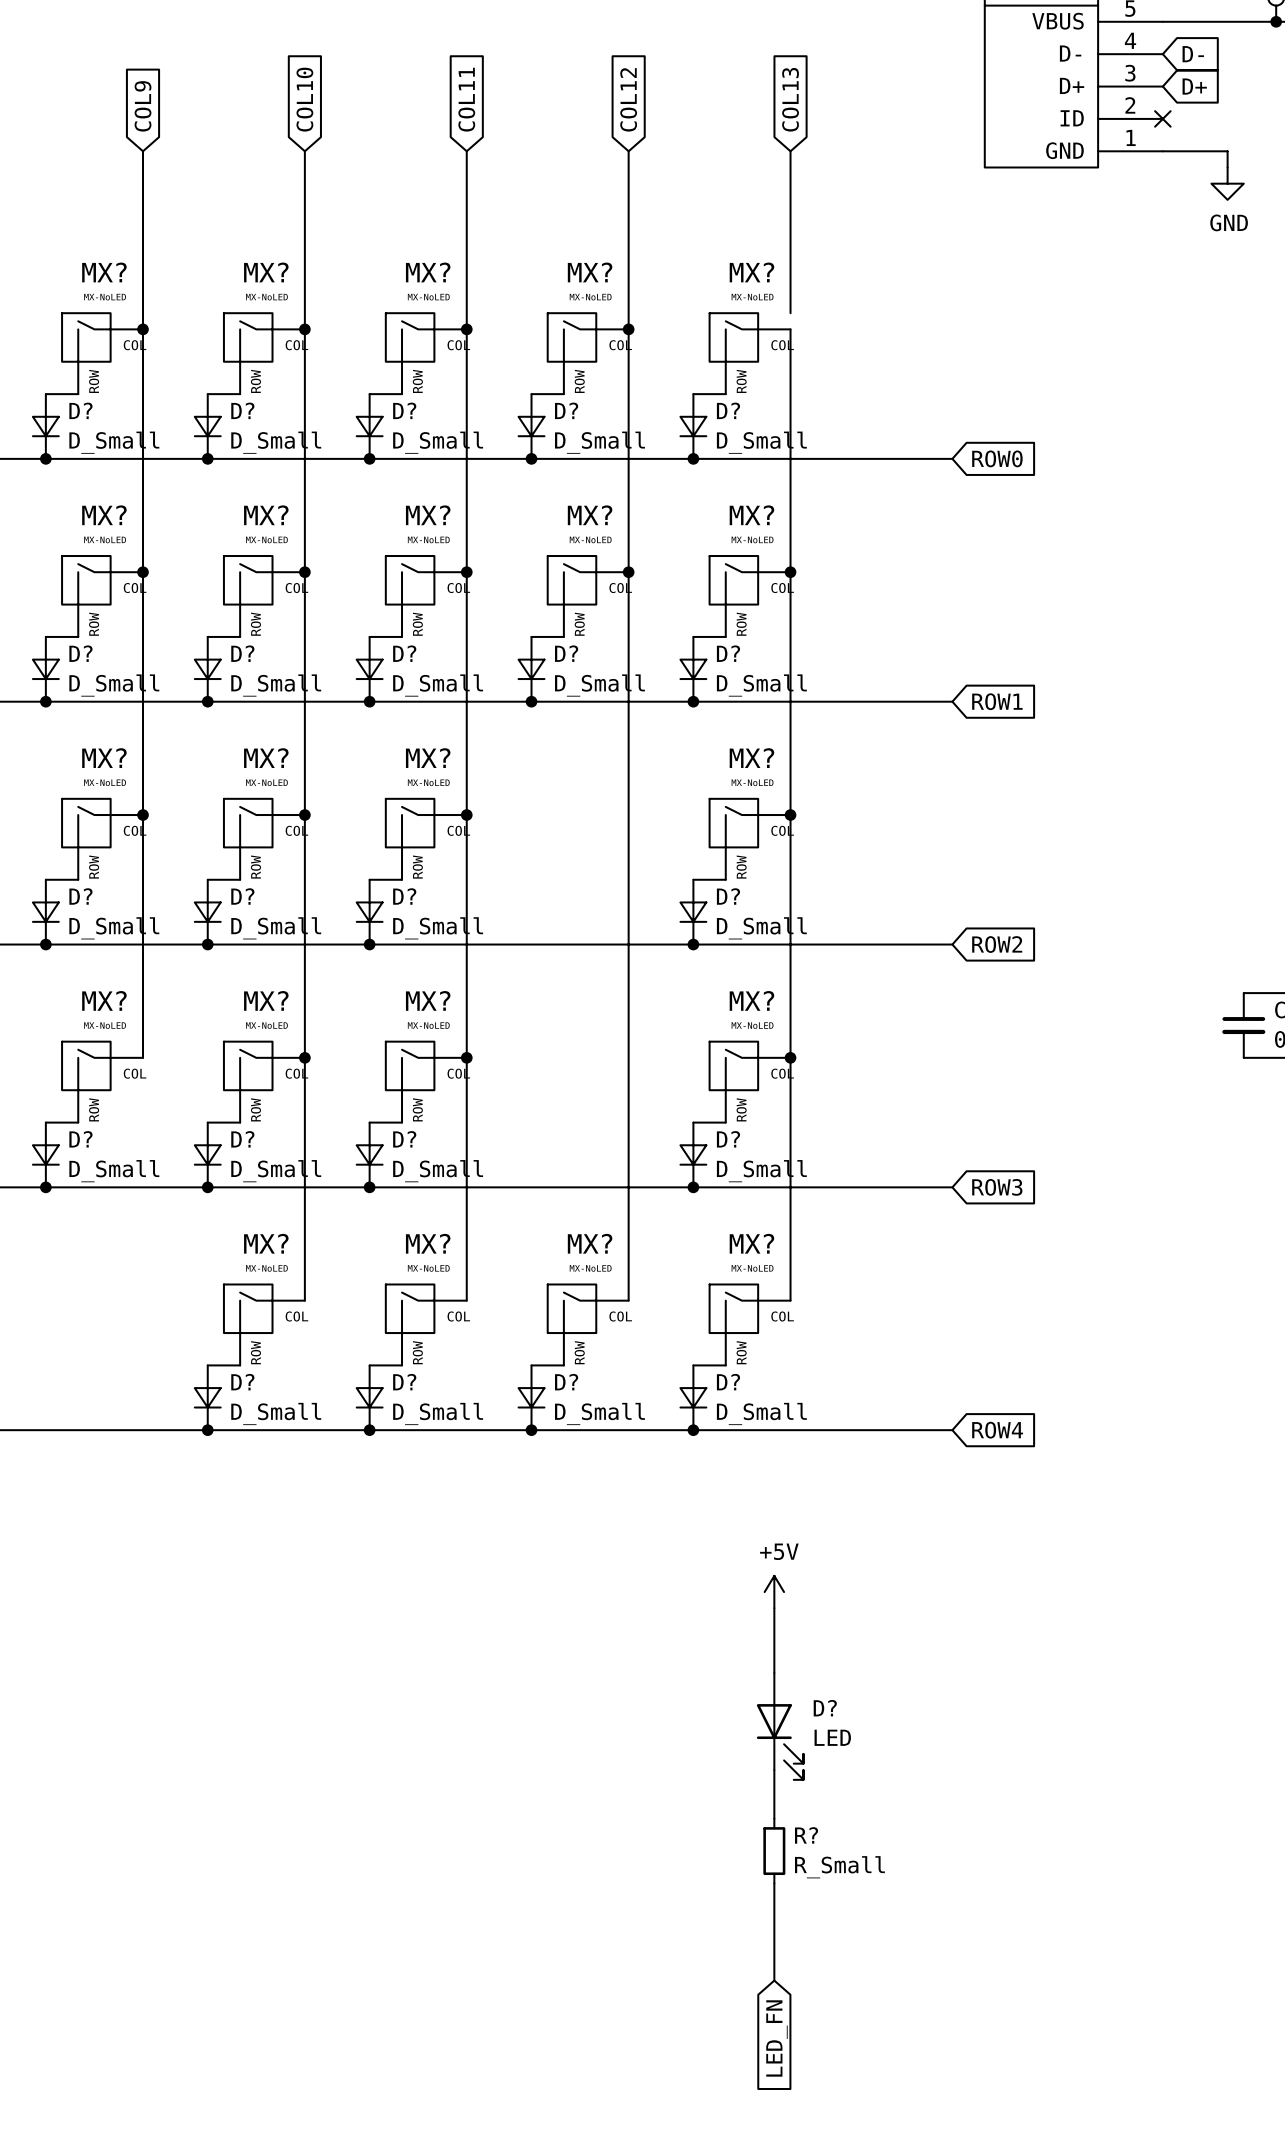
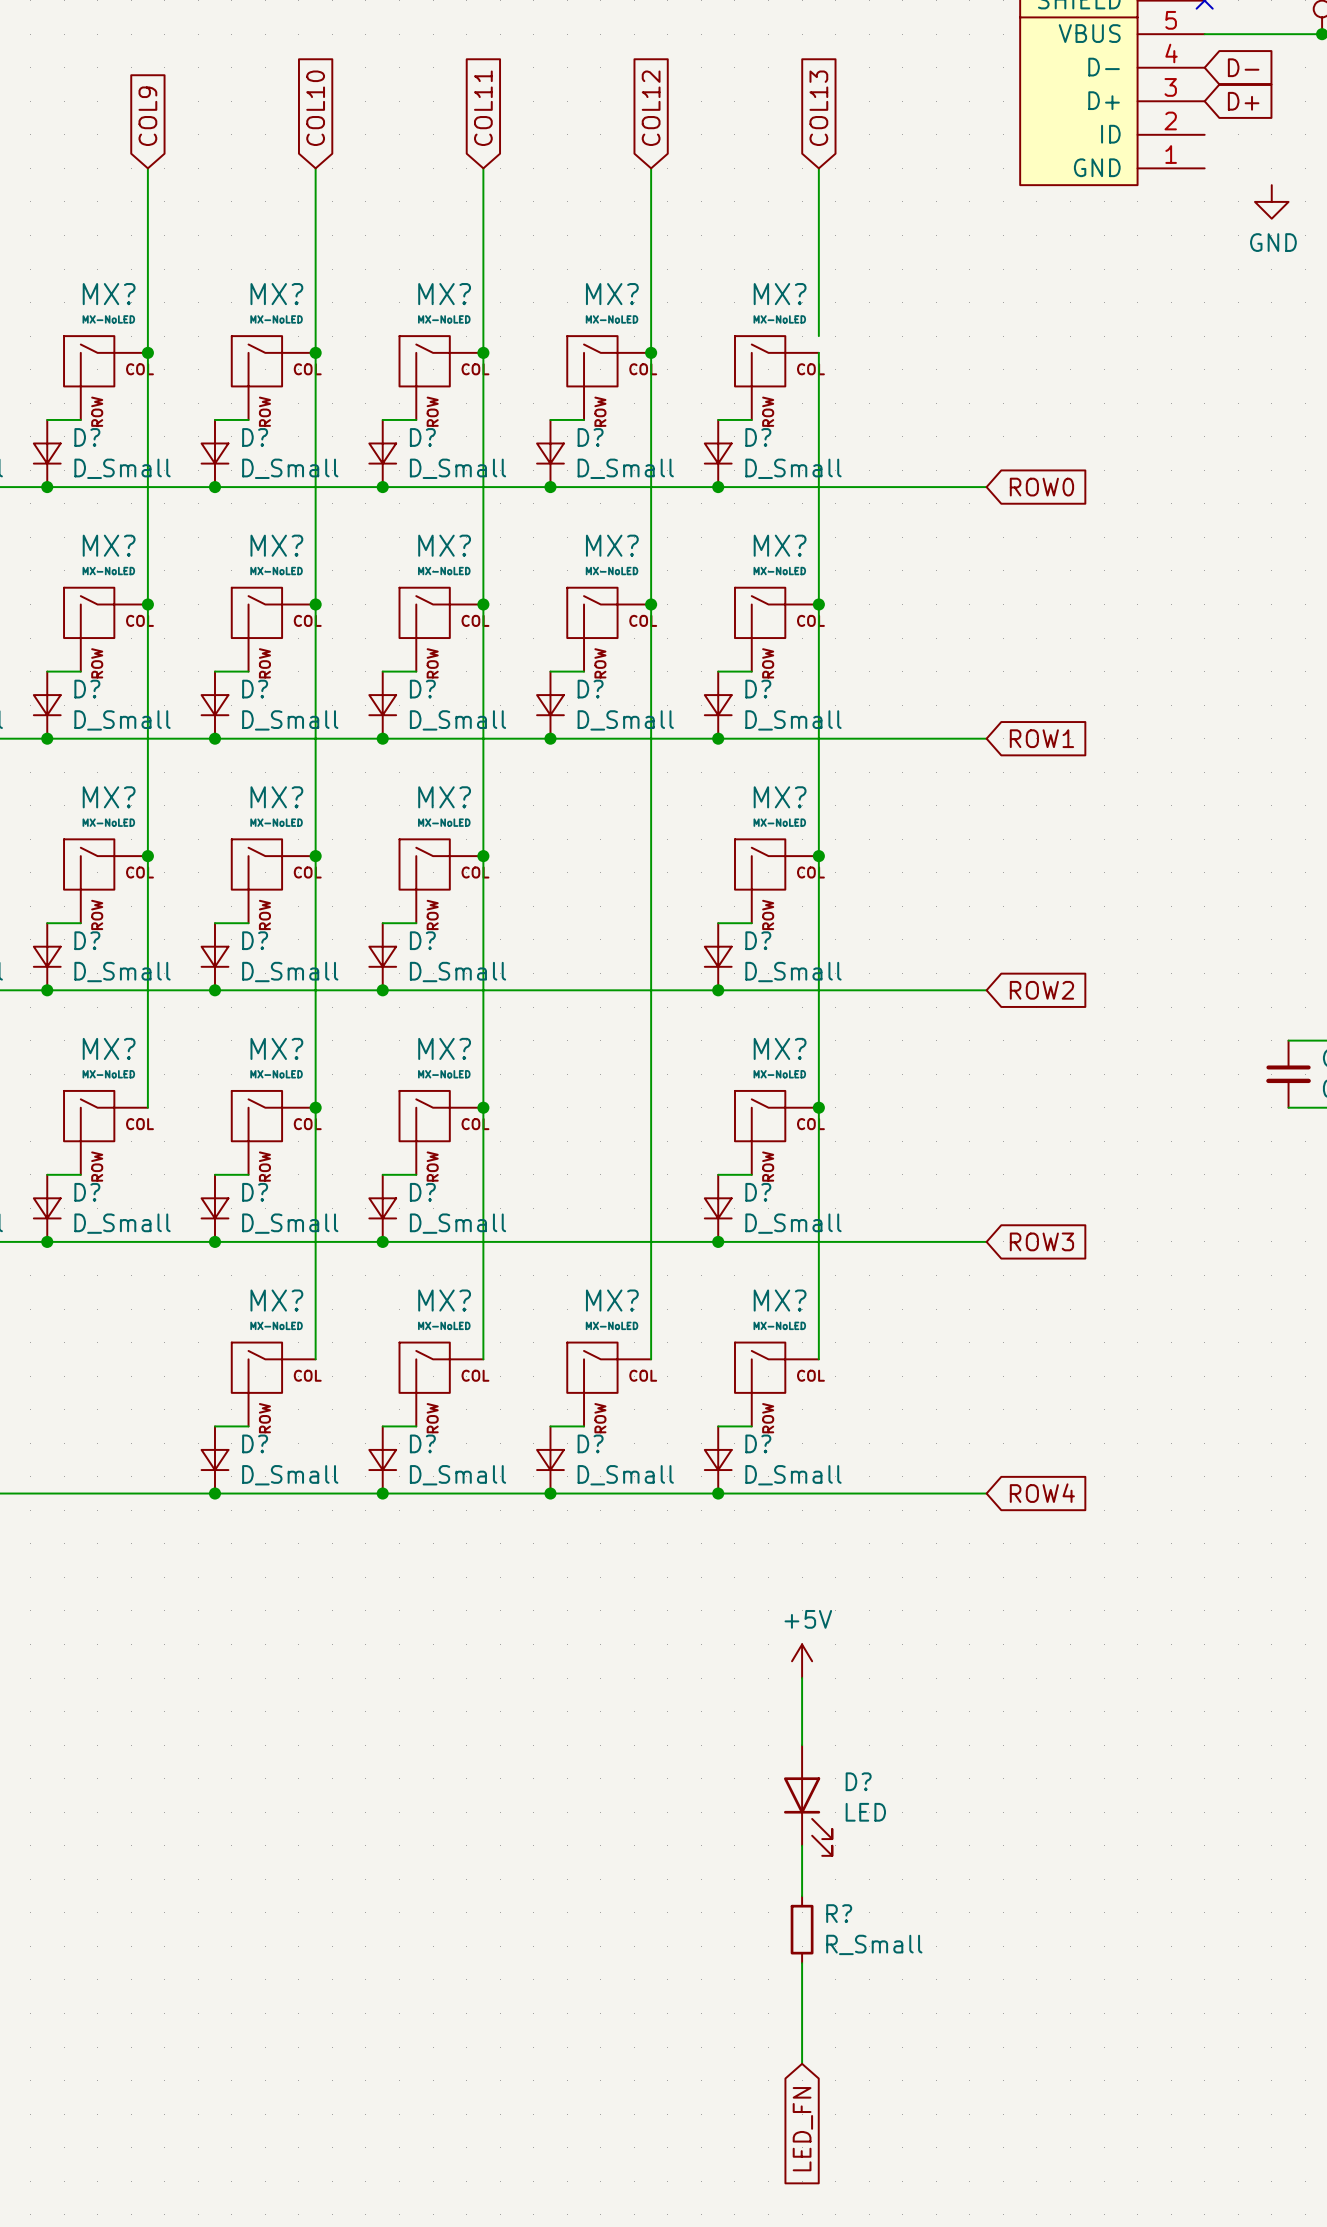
no-connect mark: (1162, 118) -> none
wire: (1162, 151) (1227, 151) (1227, 167) -> none

